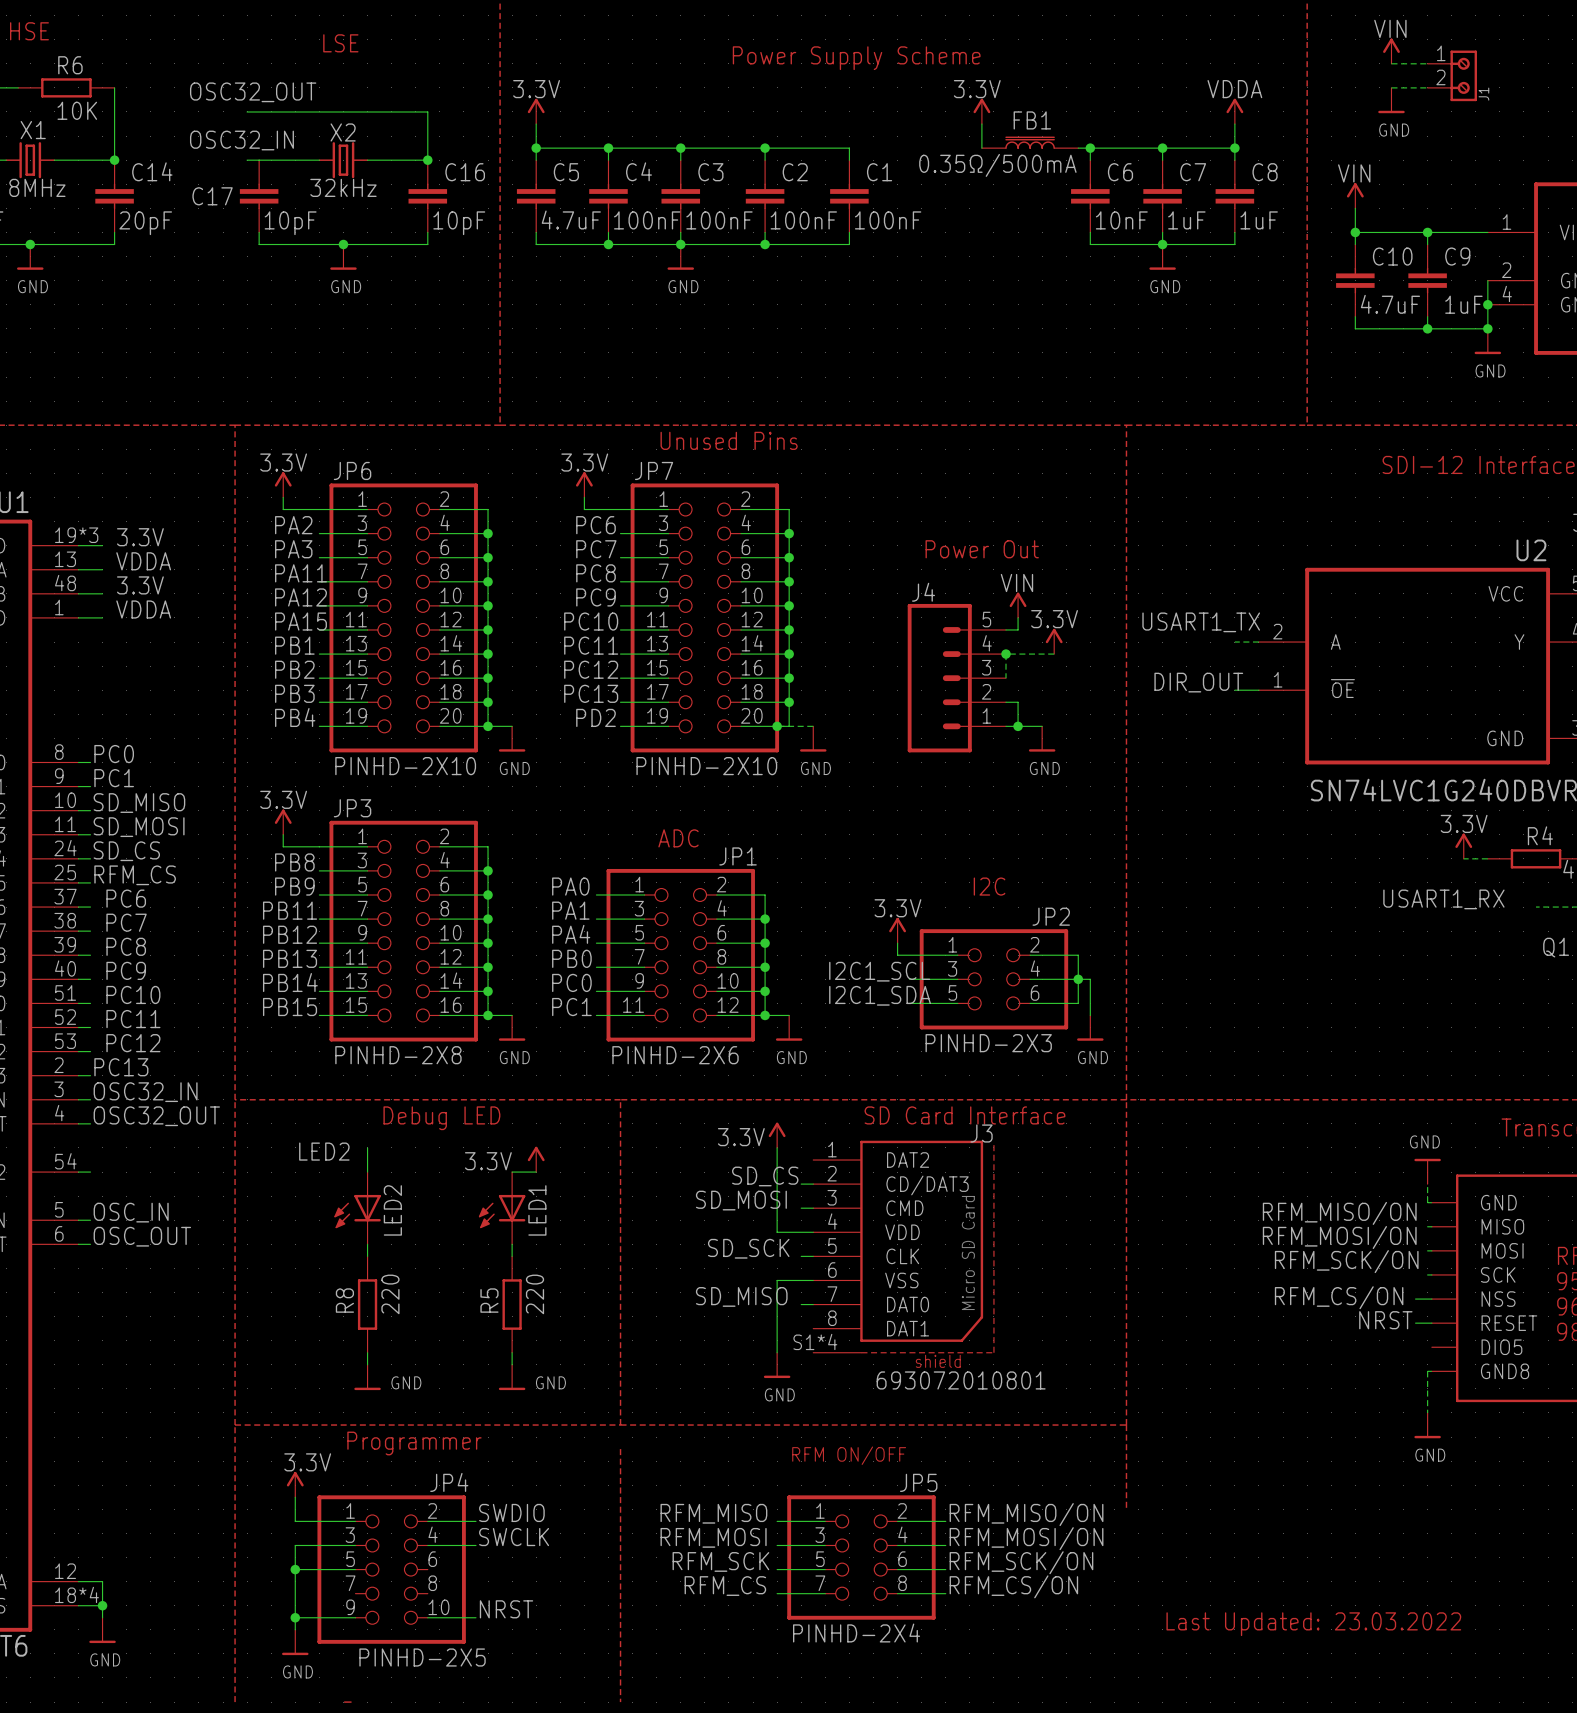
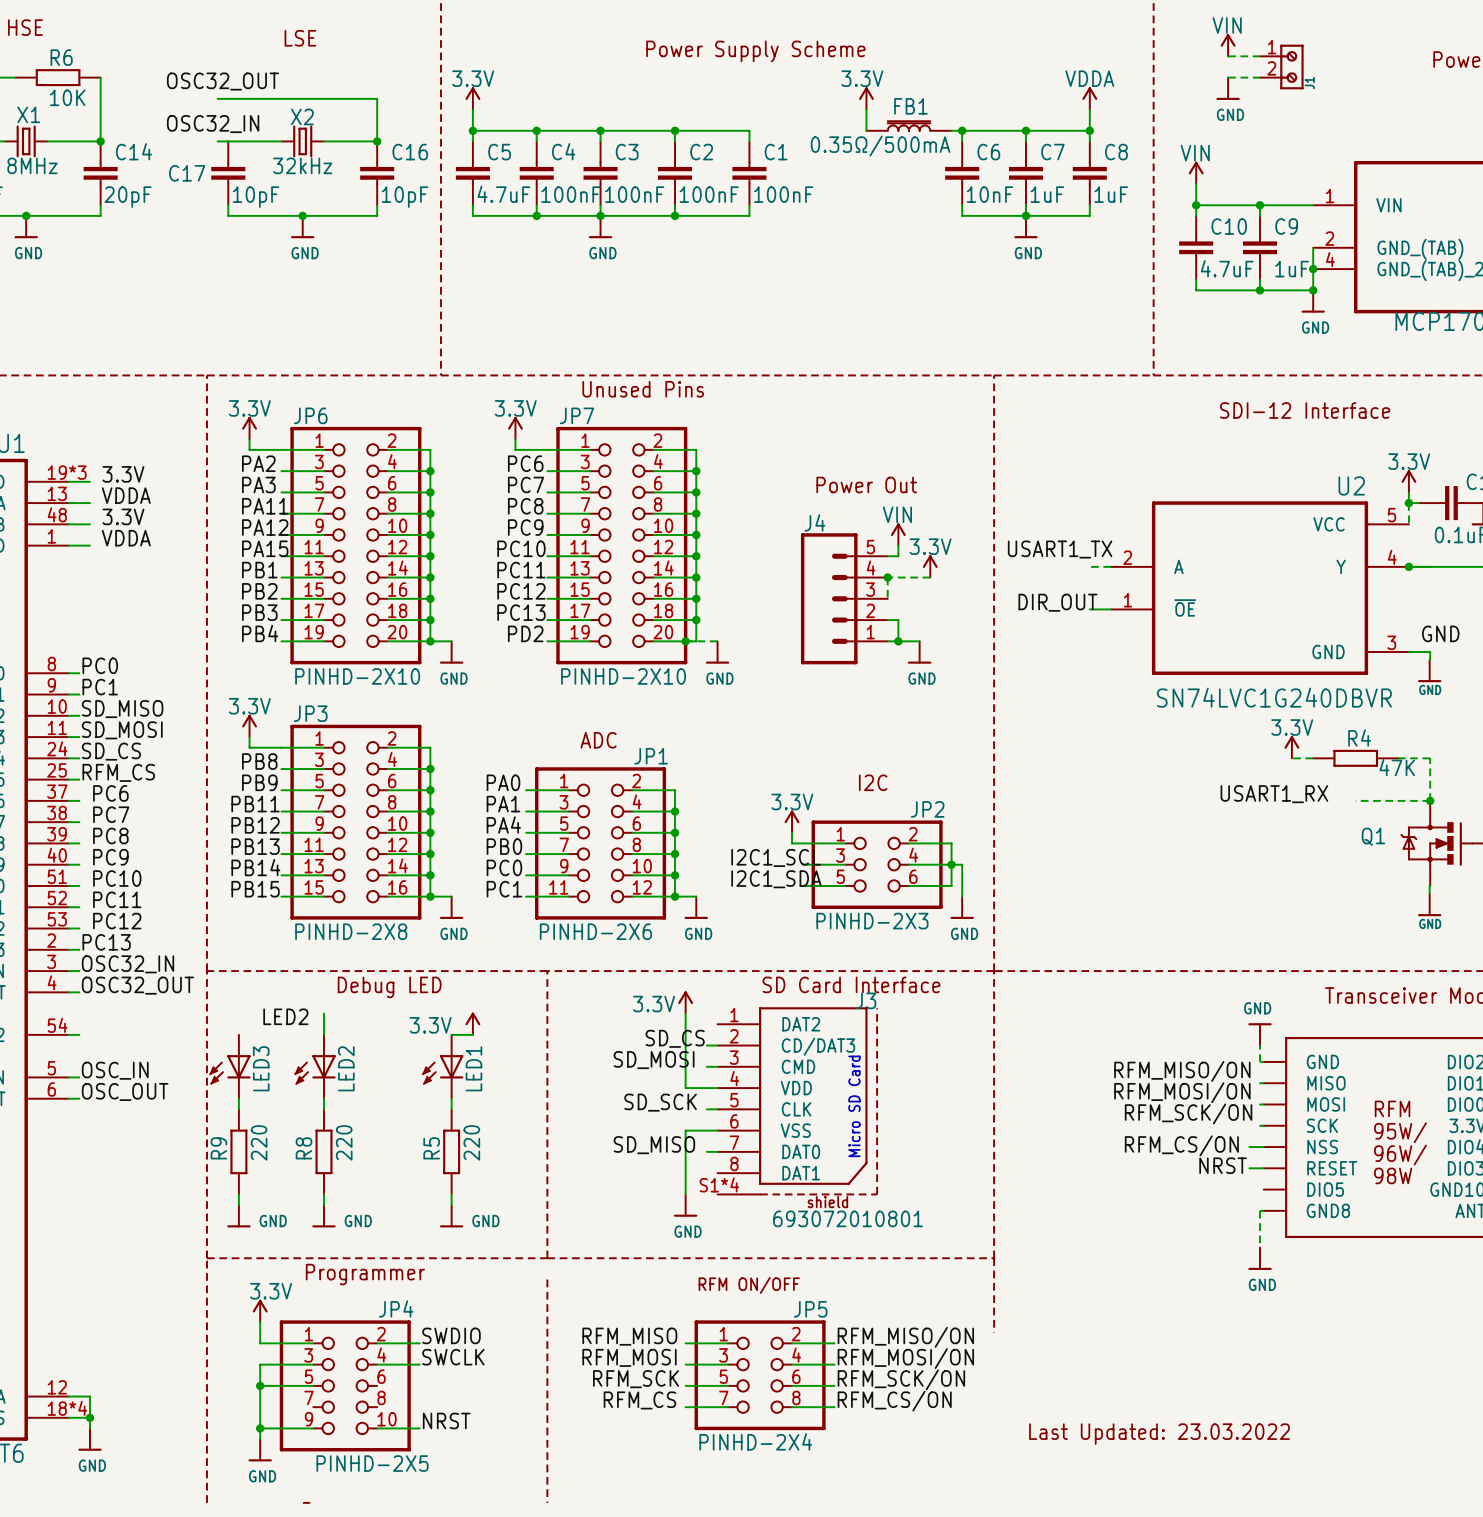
LED3: none -> (230, 1066)
wire: none -> (238, 1098) (238, 1109)
R9: none -> 220 (238, 1151)
wire: none -> (238, 1194) (238, 1205)
power symbol: none -> GND (238, 1216)

